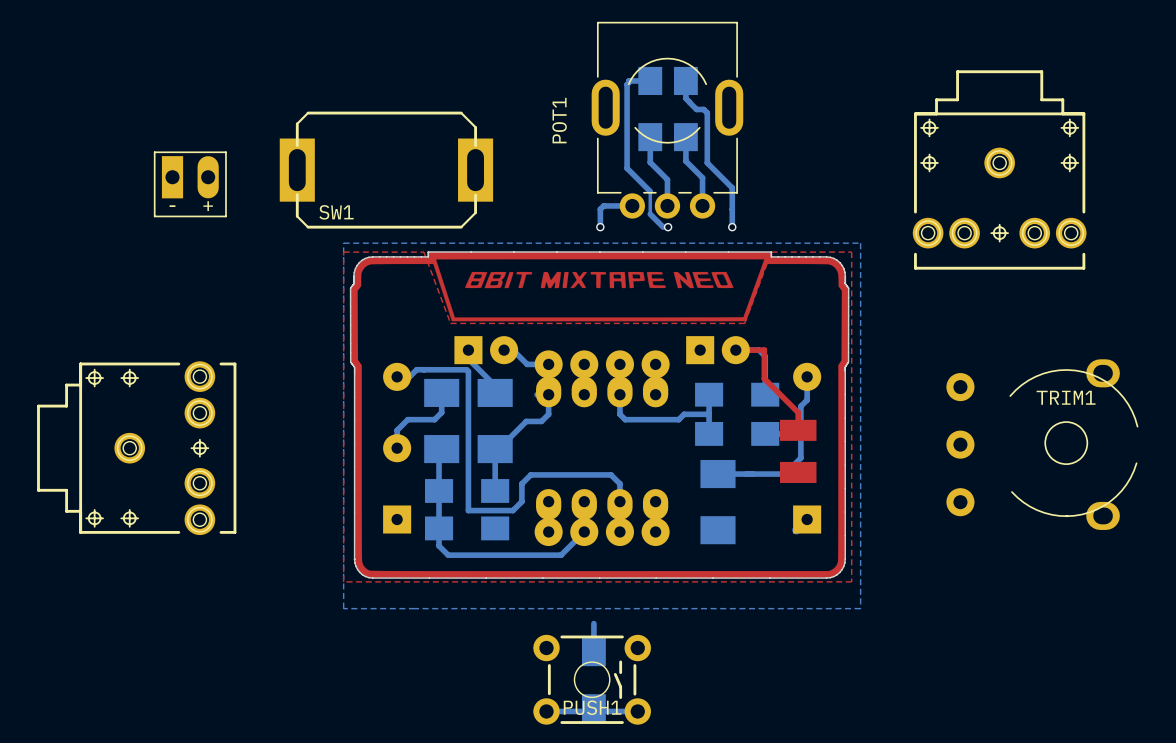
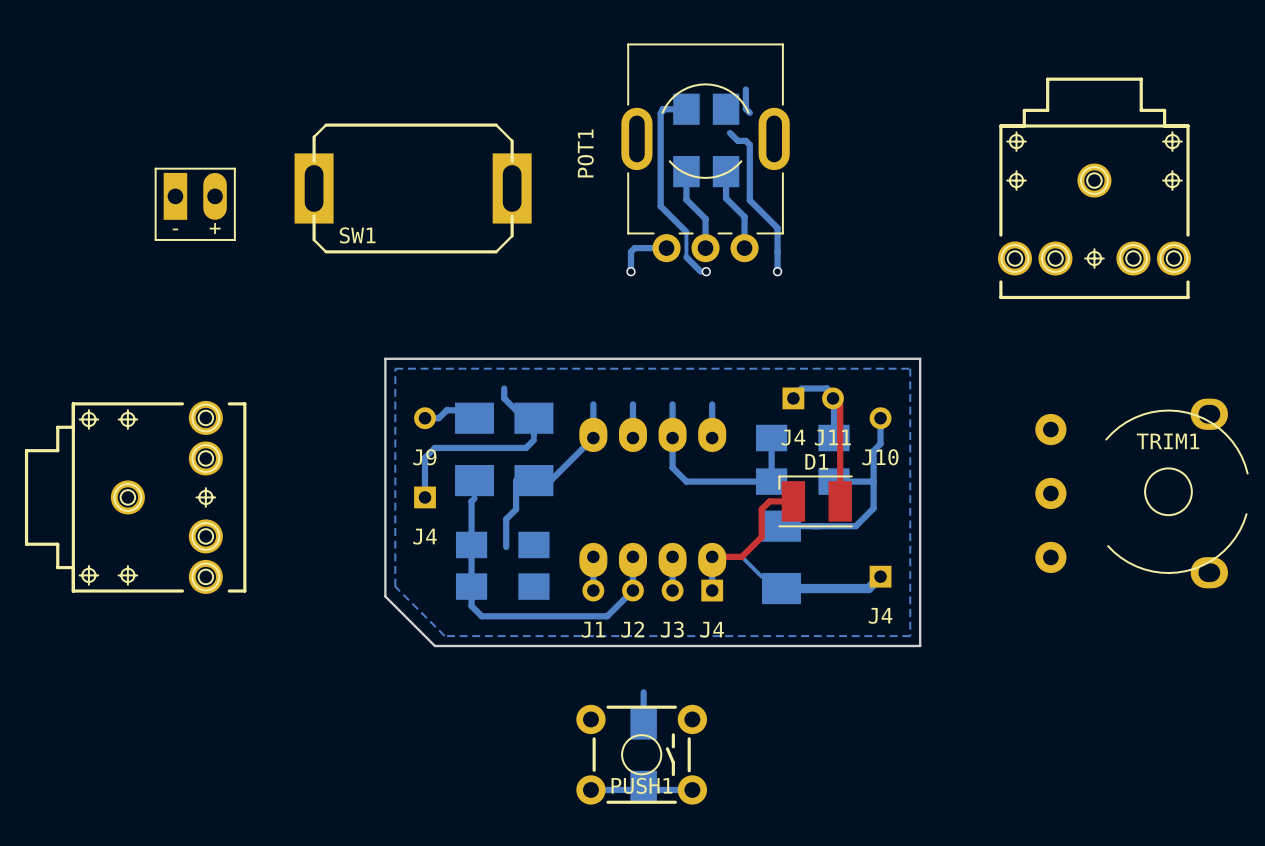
bottom track: (650, 80) (628, 80) (627, 84) (627, 168) (650, 191) (650, 214) (663, 227) (668, 227) -> (686, 109) (662, 109) (660, 113) (660, 206) (686, 232) (686, 257) (700, 271) (706, 271)
bottom track: (689, 102) (696, 109) (703, 109) (707, 113) (707, 162) (732, 187) (732, 227) -> (730, 133) (737, 140) (745, 140) (749, 144) (749, 200) (777, 228) (777, 271)
part: (650, 109) -> none
part: (685, 109) -> none
POT1 position: (667, 120) -> (705, 152)
part: none -> (686, 140)
part: none -> (726, 140)
bottom track: (650, 137) (650, 162) (667, 179) (667, 205) -> (686, 171) (686, 199) (705, 218) (705, 248)
bottom track: (685, 137) (685, 161) (702, 177) (702, 205) -> (726, 171) (726, 198) (744, 216) (744, 248)
bottom track: (632, 205) (603, 205) (600, 209) (600, 227) -> (666, 248) (634, 248) (630, 251) (630, 271)
via position: (600, 227) -> (630, 271)
via: (668, 227) -> none
via: (732, 227) -> none
bottom zone outline: (343, 243) (860, 243) (860, 608) (343, 608) (343, 243) -> (395, 368) (395, 586) (444, 636) (910, 636) (910, 368) (395, 368)
via: none -> (706, 271)
via: none -> (777, 271)
drawing: [349, 251, 850, 579] -> none
top zone outline: (343, 252) (423, 252) (450, 323) (744, 323) (771, 252) (851, 252) (851, 581) (343, 581) (343, 252) -> none
board edge: none -> (385, 358) (385, 596) (434, 645) (920, 645) (920, 358) (385, 358)
part: (468, 350) -> none
bottom track: (504, 350) (513, 350) (527, 364) (548, 364) -> none
part: (504, 350) -> none
part: (700, 350) -> none
top track: (735, 350) (764, 350) (764, 378) (798, 412) (798, 430) -> none
part: (735, 350) -> none
J4: none -> (793, 398)
top track: none -> (833, 398) (840, 405) (840, 501)
J11: none -> (833, 398)
part: (548, 364) -> none
part: (584, 364) -> none
part: (619, 364) -> none
part: (655, 364) -> none
bottom track: (424, 369) (466, 369) (468, 371) (468, 510) (513, 510) (521, 501) (521, 483) (530, 474) (611, 474) (619, 483) (619, 501) -> none
part: (397, 376) -> none
J9: none -> (425, 418)
part: (807, 376) -> none
J10: none -> (880, 418)
bottom track: (441, 392) (441, 412) (434, 419) (407, 419) (397, 430) -> (526, 447) (434, 447) (425, 457) (425, 477)
bottom track: (537, 394) (548, 394) (548, 414) (541, 421) (526, 421) (498, 449) (495, 449) (495, 490) -> none
bottom track: none -> (593, 438) (550, 480) (516, 480) (516, 509) (506, 519) (506, 546)
bottom track: (619, 414) (625, 419) (678, 419) (684, 414) (709, 414) -> (672, 459) (672, 467) (686, 481) (771, 481)
part position: (441, 421) -> (474, 449)
part position: (495, 421) -> (533, 449)
part: (397, 448) -> none
J4: none -> (425, 497)
top track: none -> (793, 501) (769, 501) (761, 509) (761, 537) (741, 556) (712, 556)
D1: none -> (815, 501)
part: (798, 451) -> none
bottom track: none -> (741, 556) (761, 576)
part: (397, 519) -> none
part: (807, 519) -> none
J4: none -> (880, 576)
bottom track: none -> (781, 588) (868, 588)
part: (548, 531) -> none
J1: none -> (593, 590)
part: (584, 531) -> none
J2: none -> (632, 590)
part: (619, 531) -> none
J3: none -> (672, 590)
part: (655, 531) -> none
J4: none -> (712, 590)

